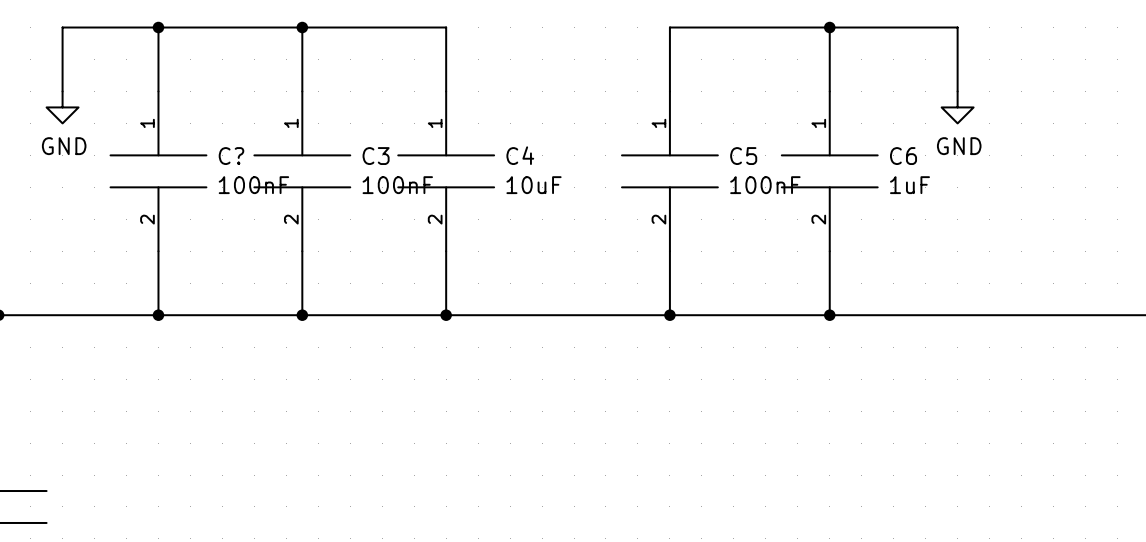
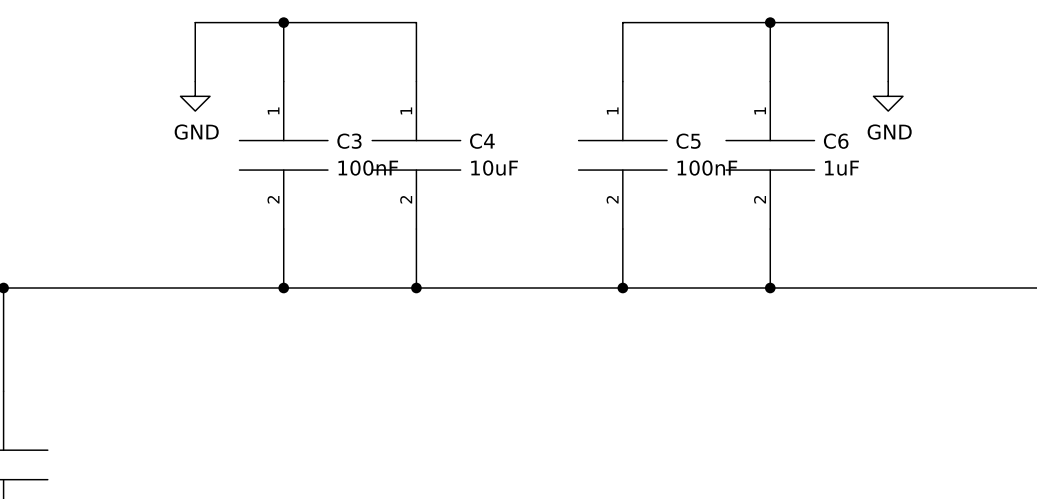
wire: (158, 27) (158, 91) -> none
junction: (158, 27) -> none
wire: (206, 27) (62, 27) (62, 91) -> (195, 22) (195, 81)
power symbol position: GND (62, 107) -> GND (195, 96)
C?: 100nF (158, 171) -> none
wire: (158, 251) (158, 315) -> none
junction: (158, 315) -> none

